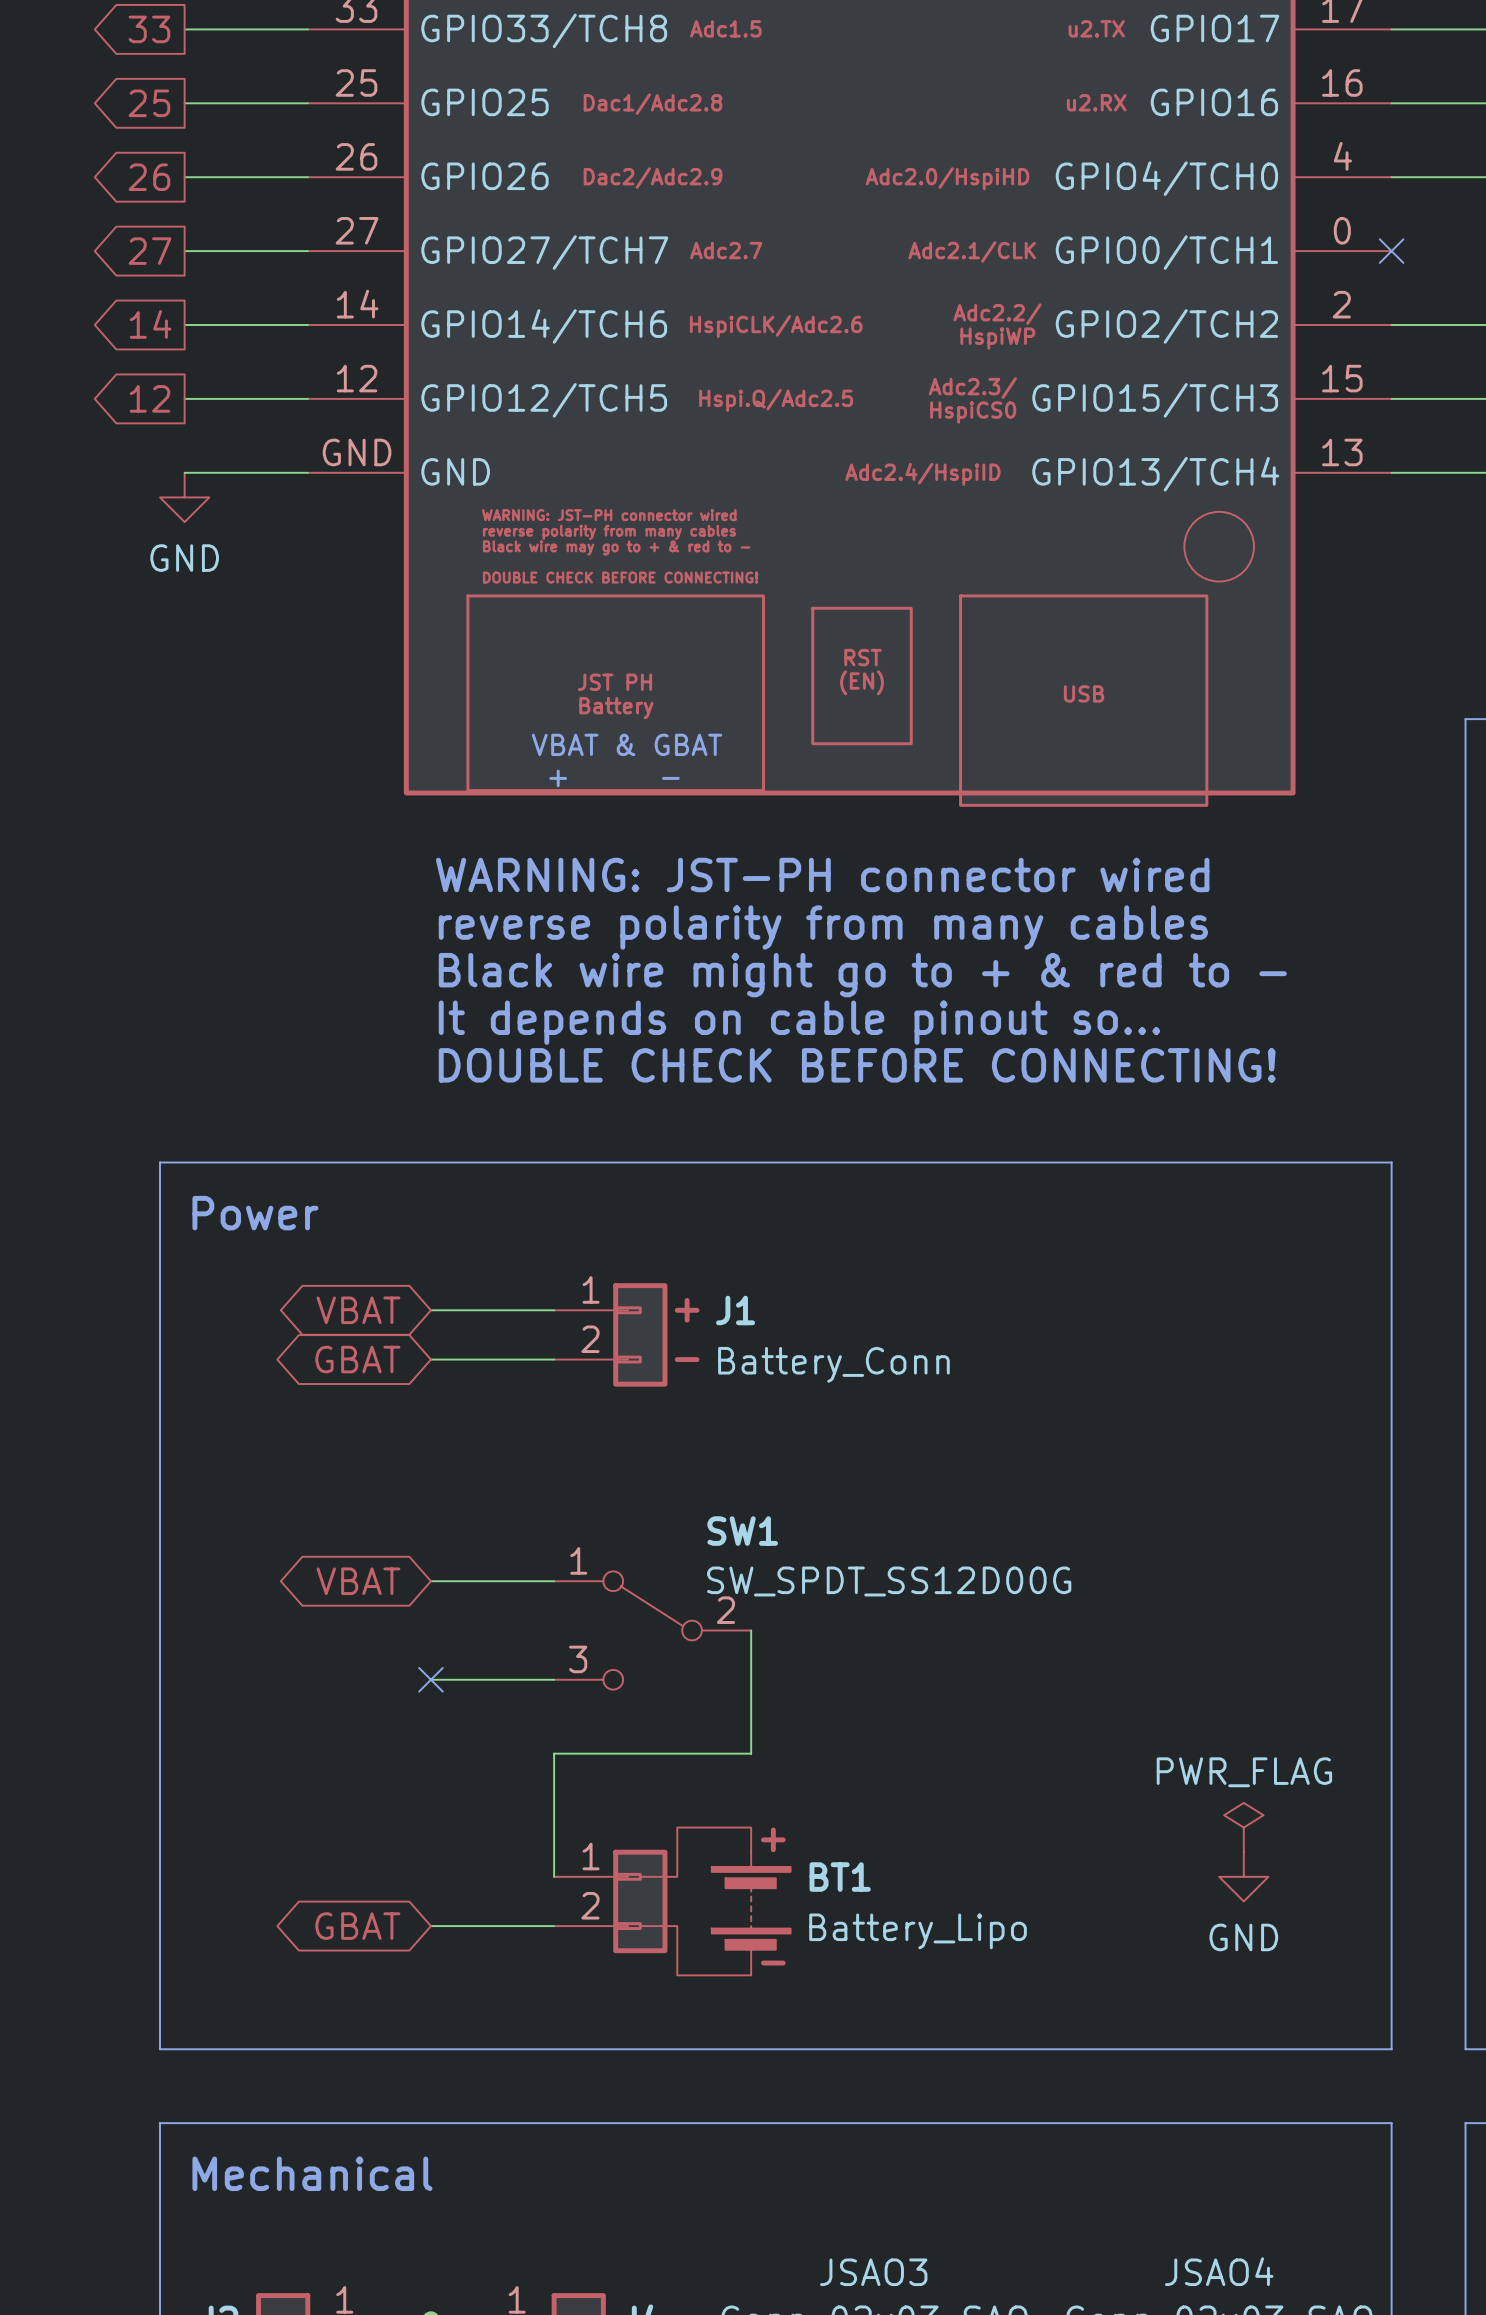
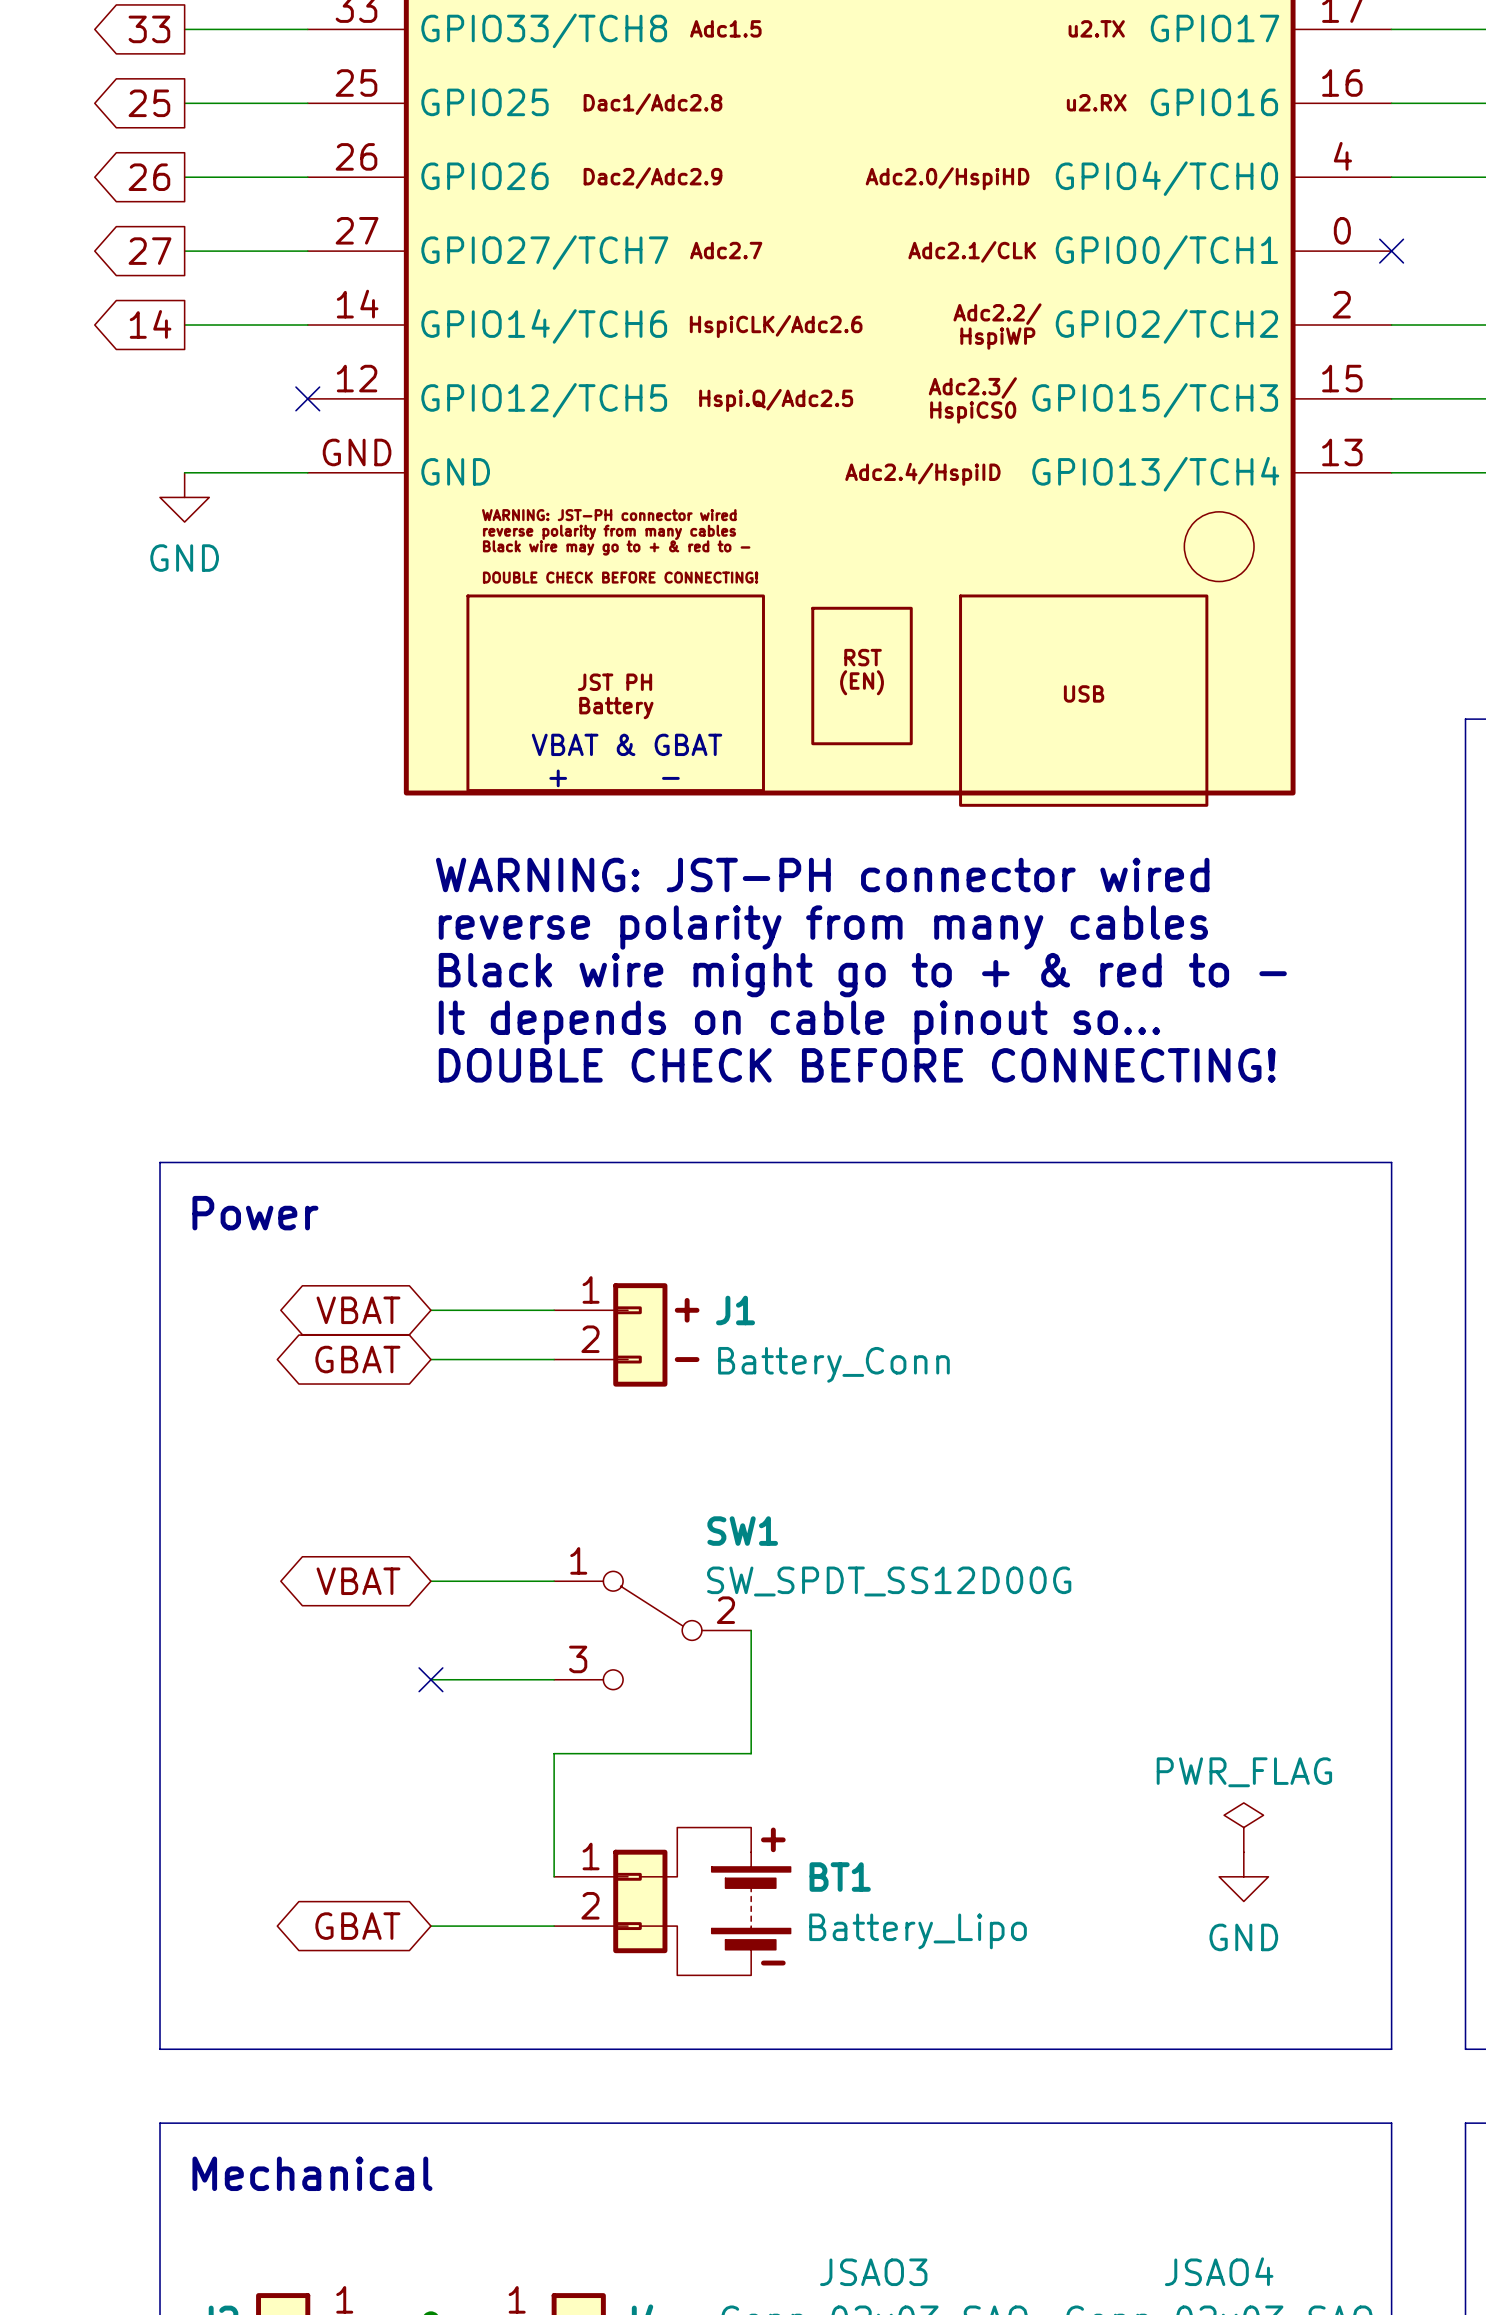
global label: 12 (149, 398) -> none
wire: (184, 398) (307, 398) -> none
no-connect mark: none -> (307, 398)

